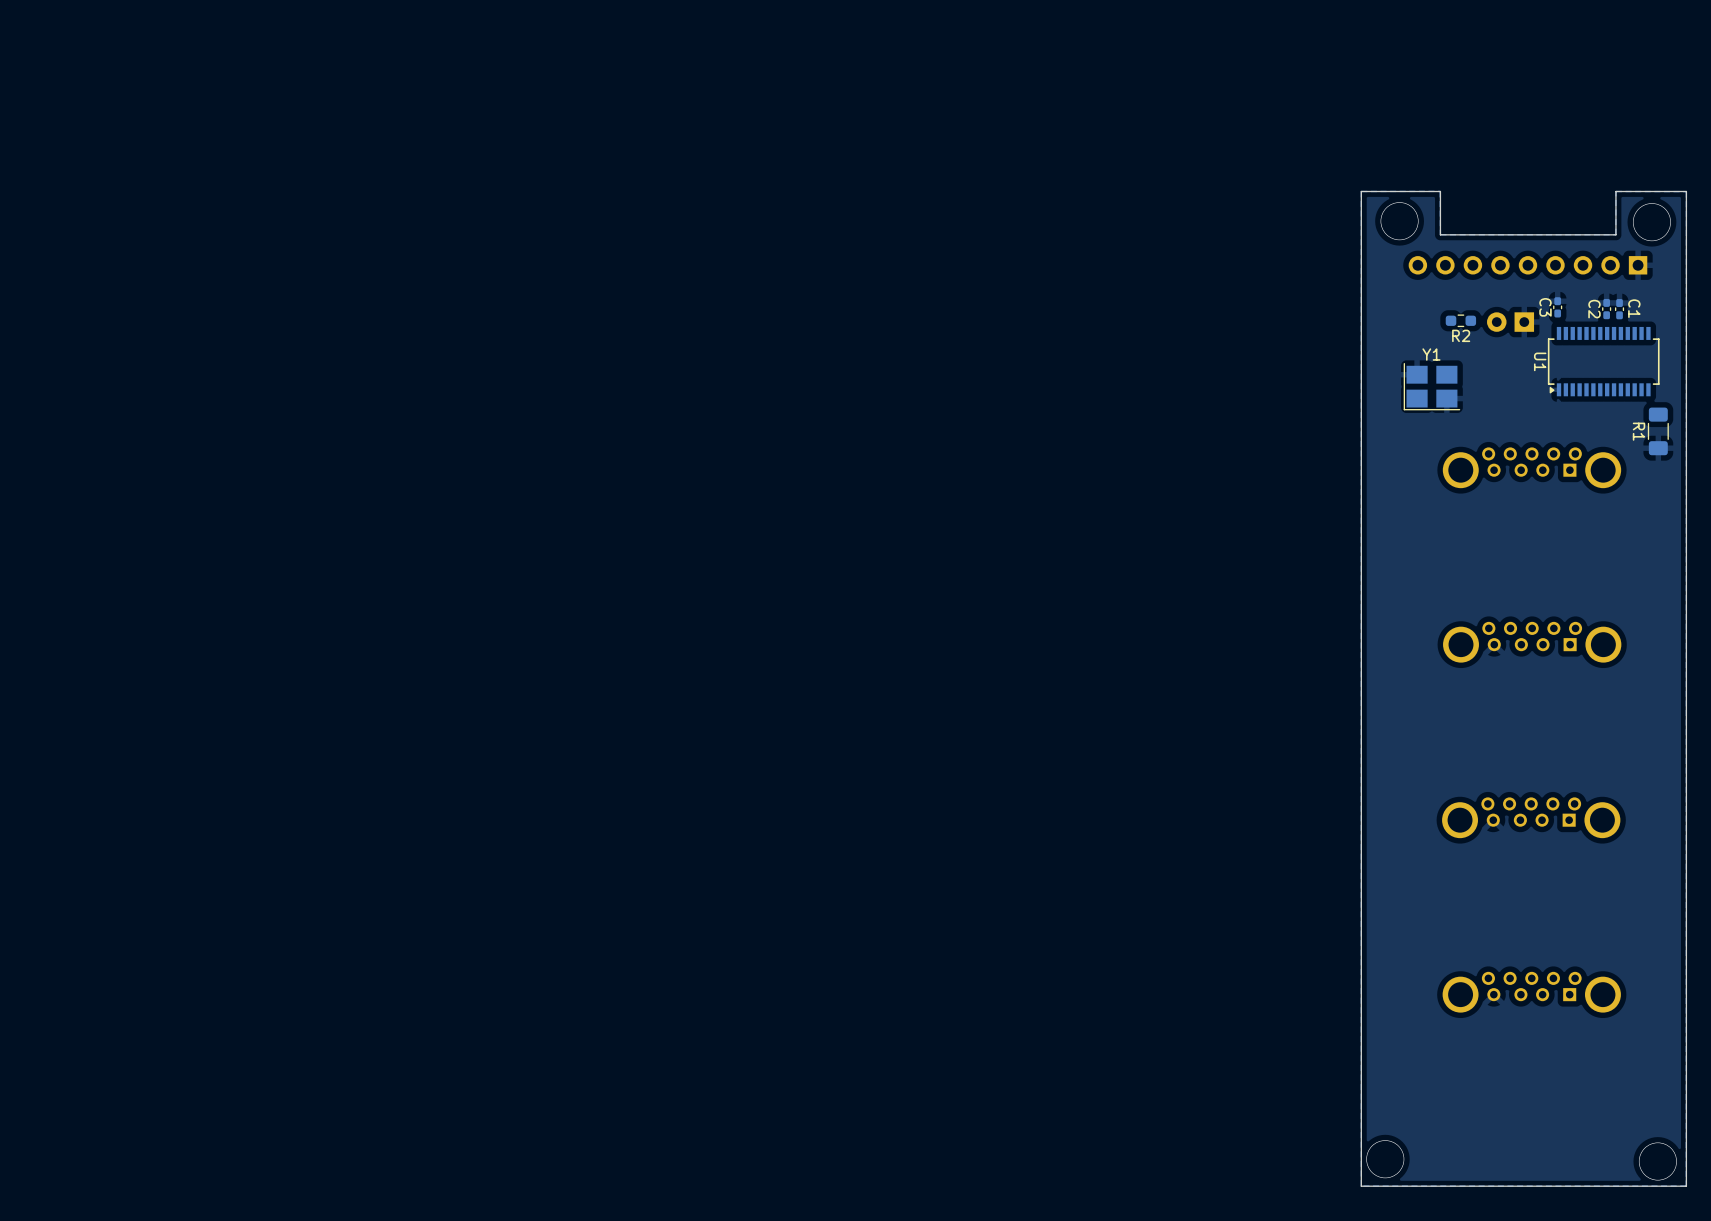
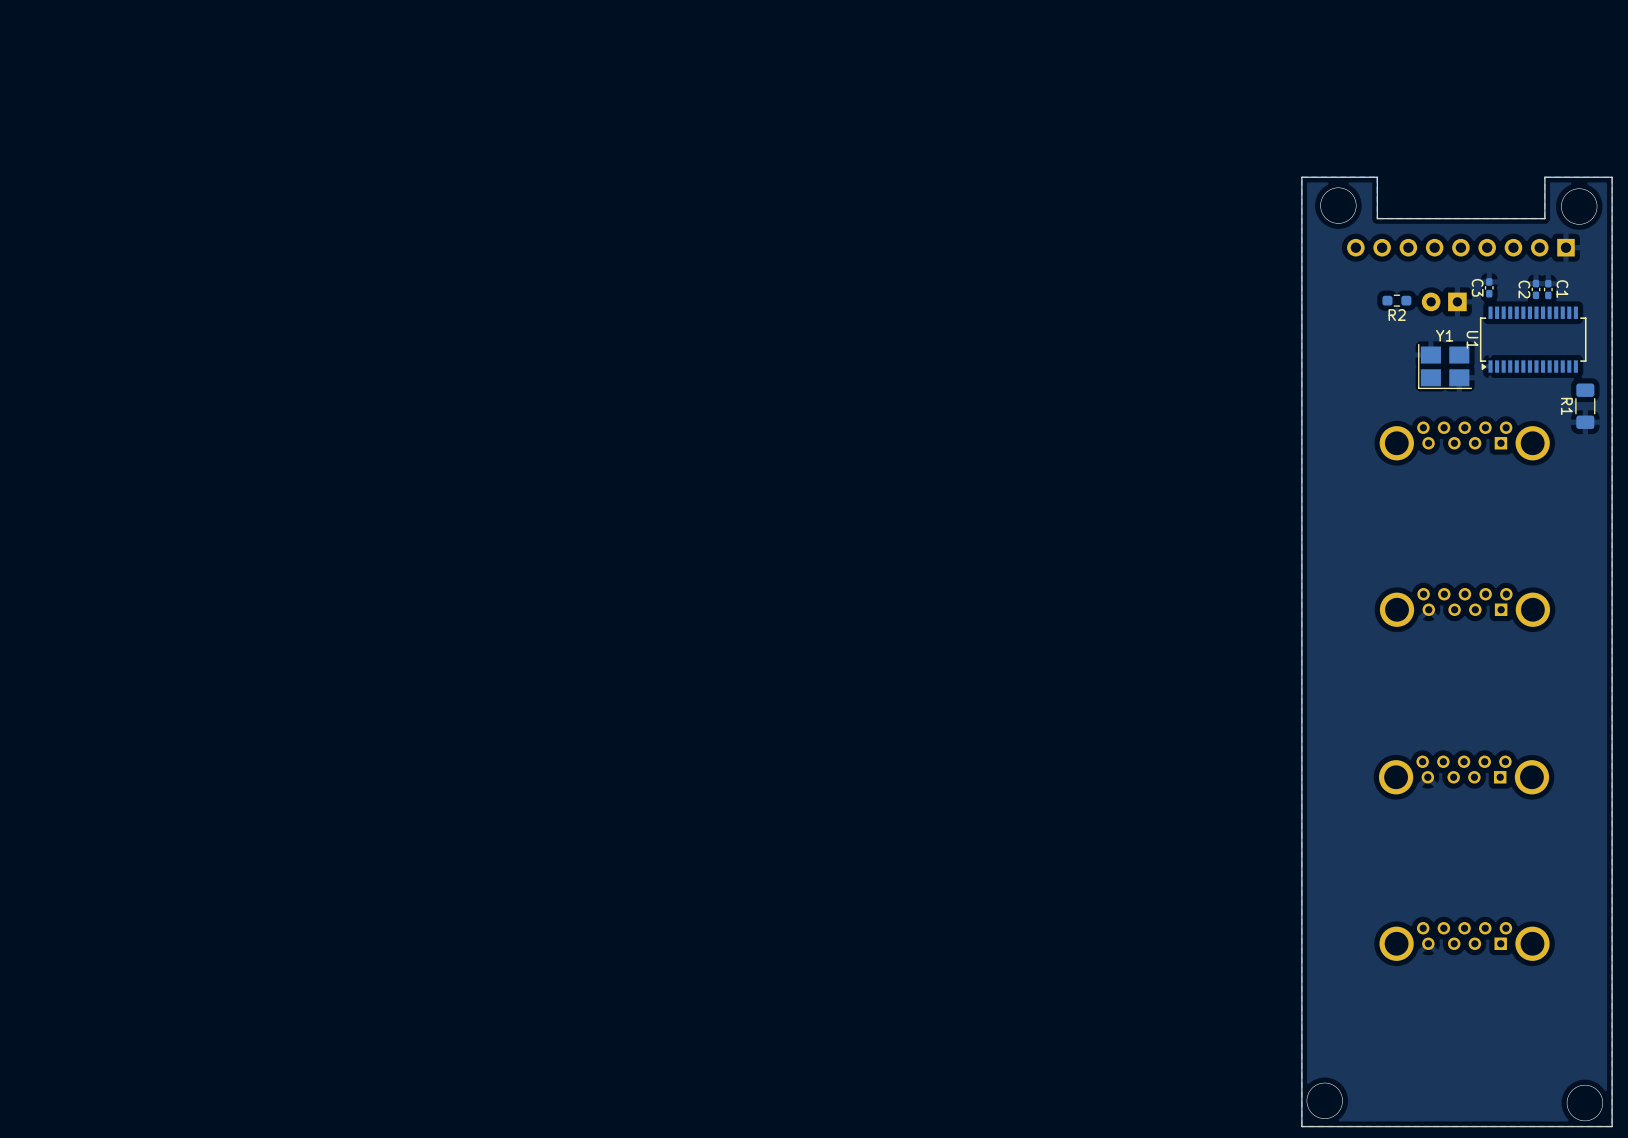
Y1 position: (1431, 386) -> (1445, 366)

